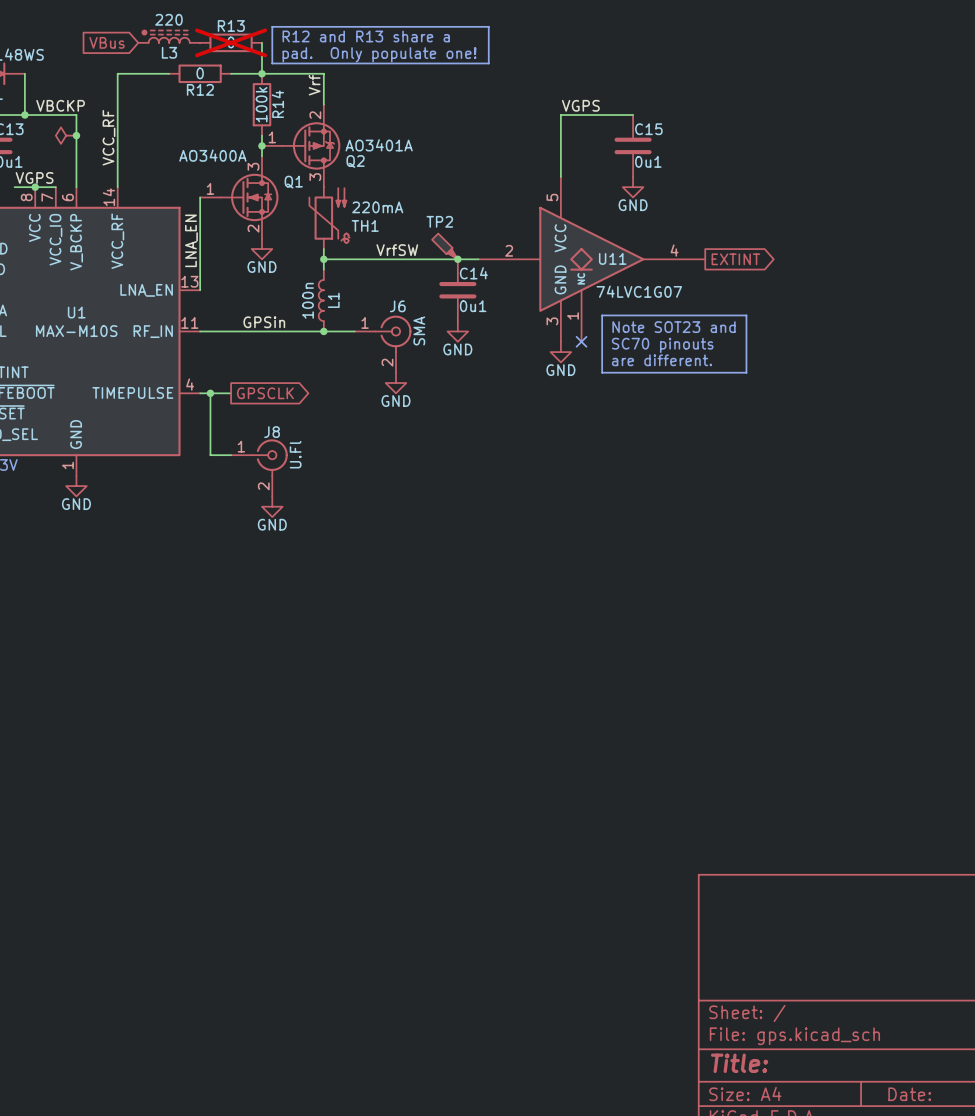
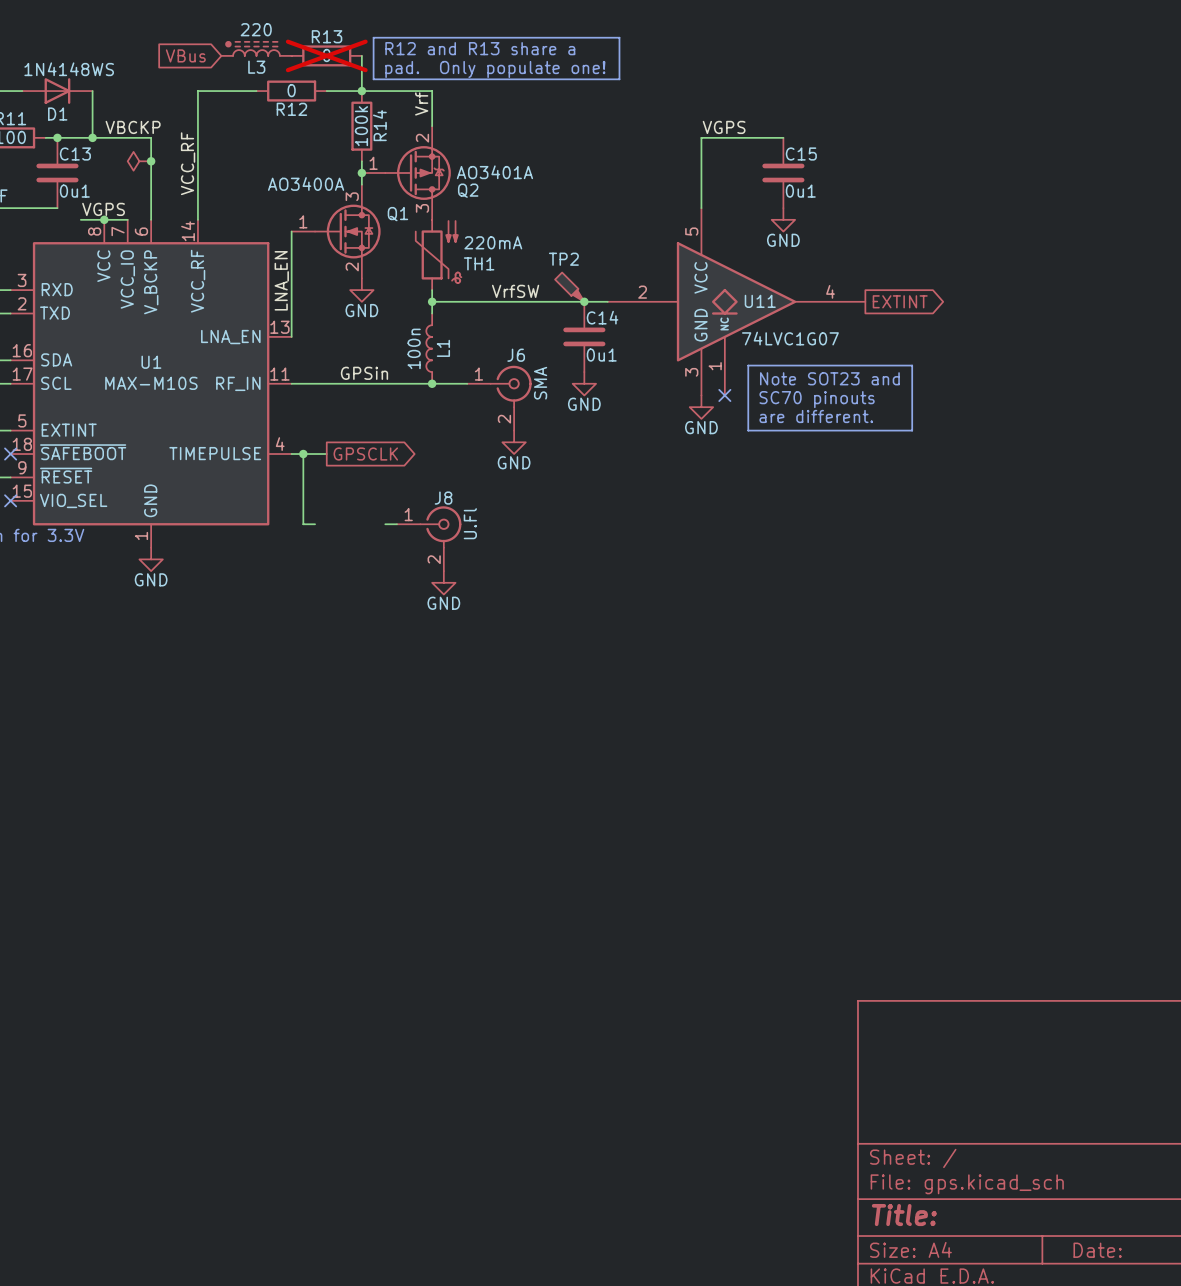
wire: (220, 455) (231, 455) -> (385, 524) (397, 524)
J8 position: (259, 467) -> (429, 538)
power symbol position: GND (272, 506) -> GND (443, 582)

